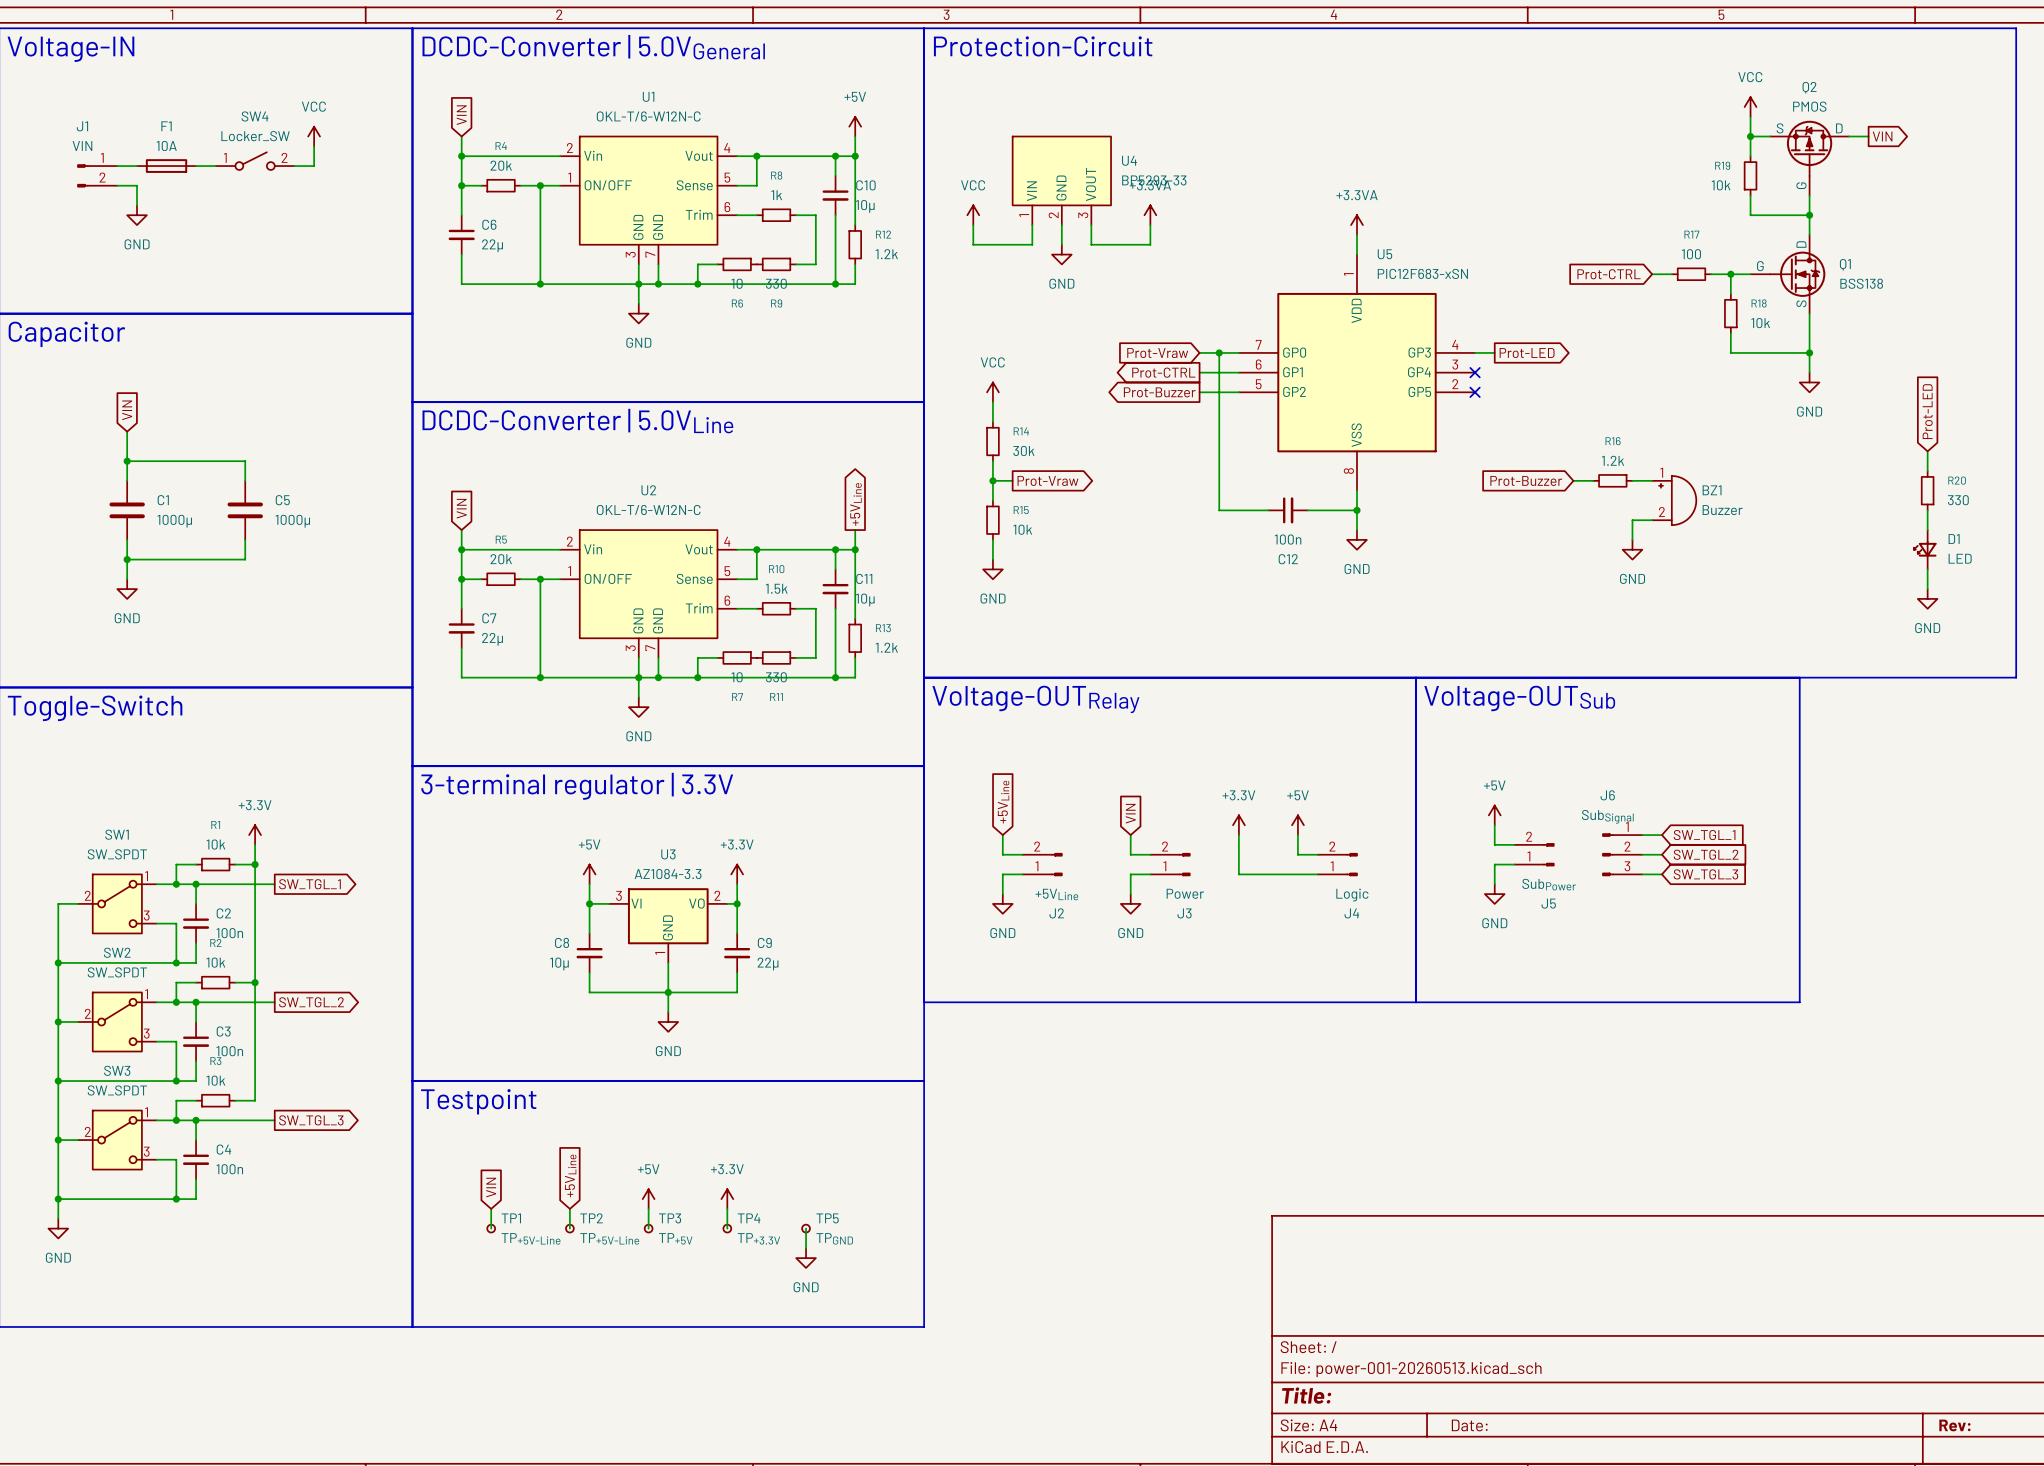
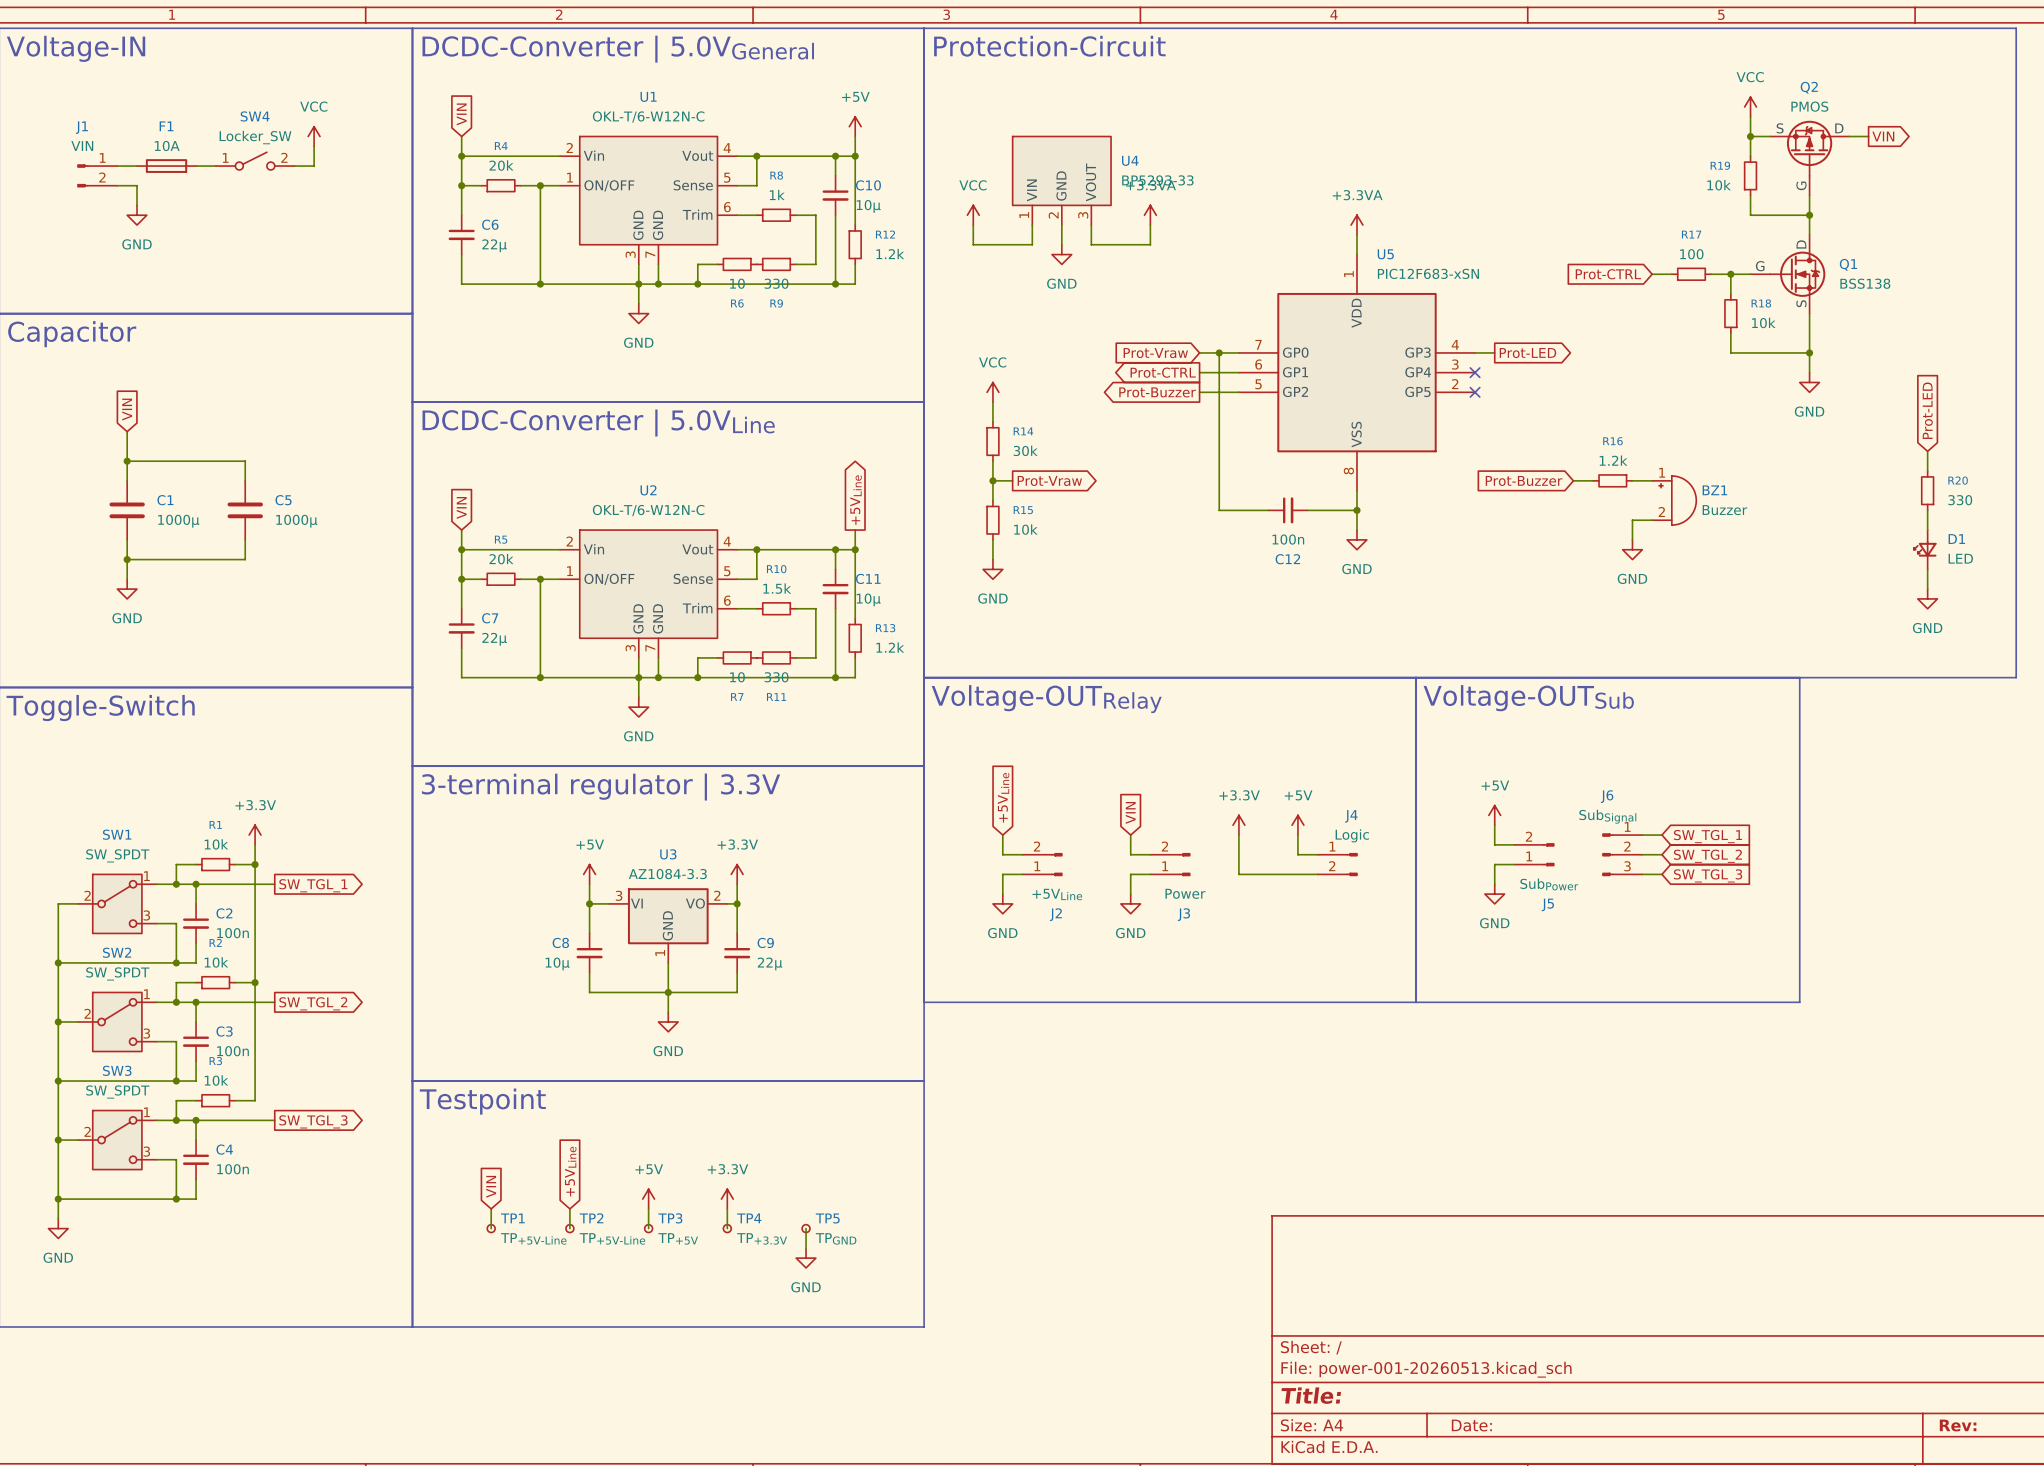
J4 flip: as is (1352, 864) -> up-down (1352, 864)

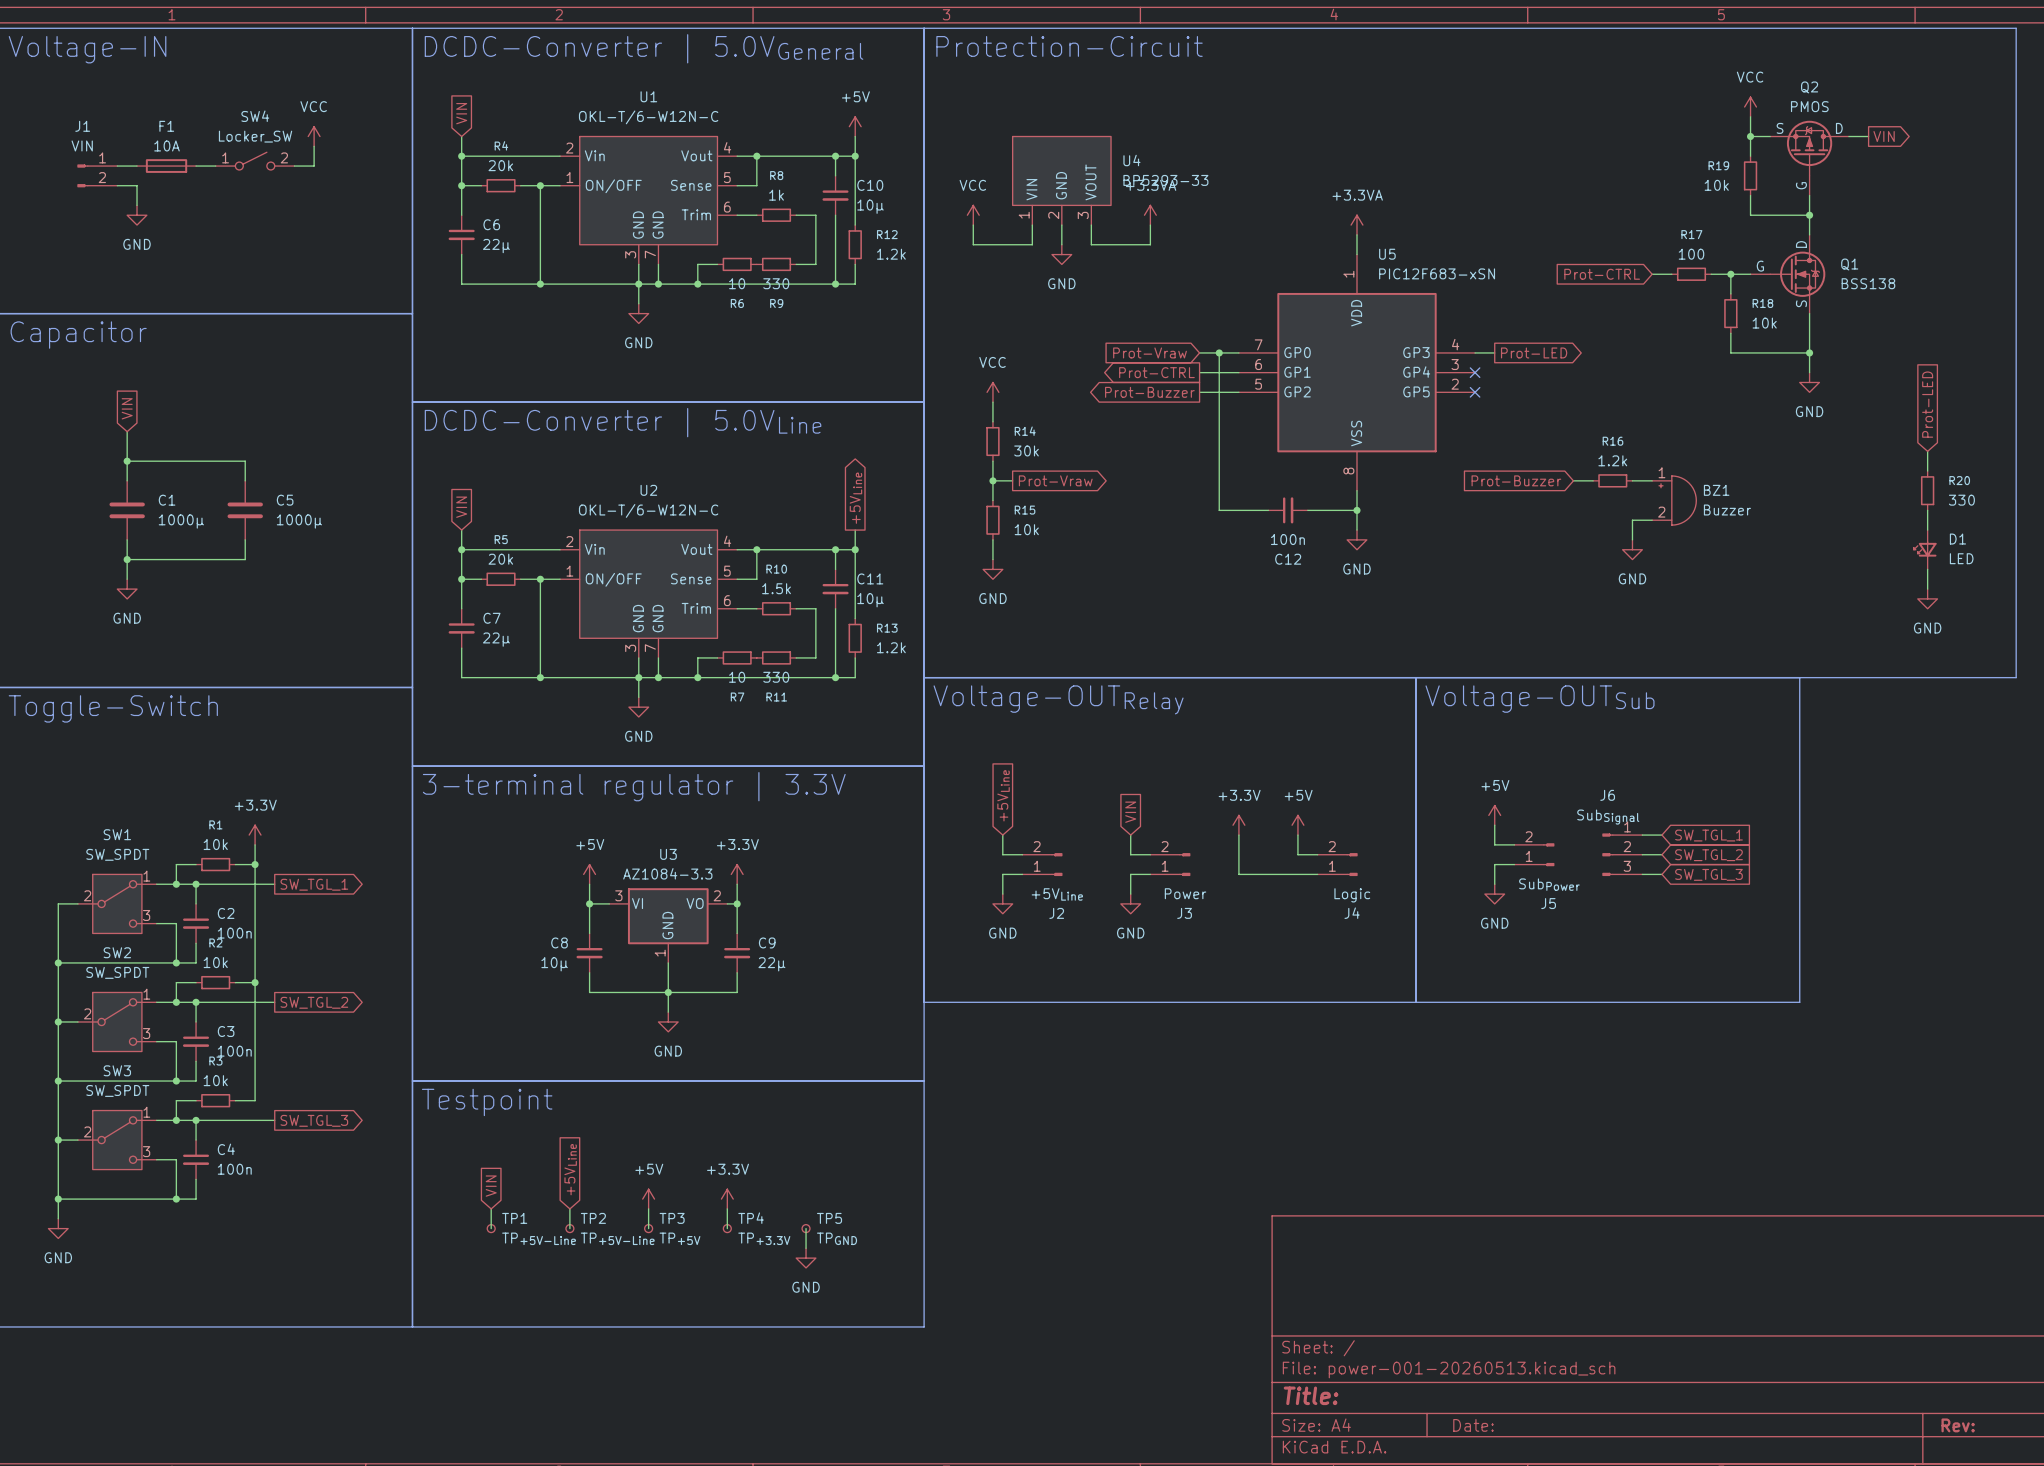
J4 flip: as is (1352, 864) -> up-down (1352, 864)

